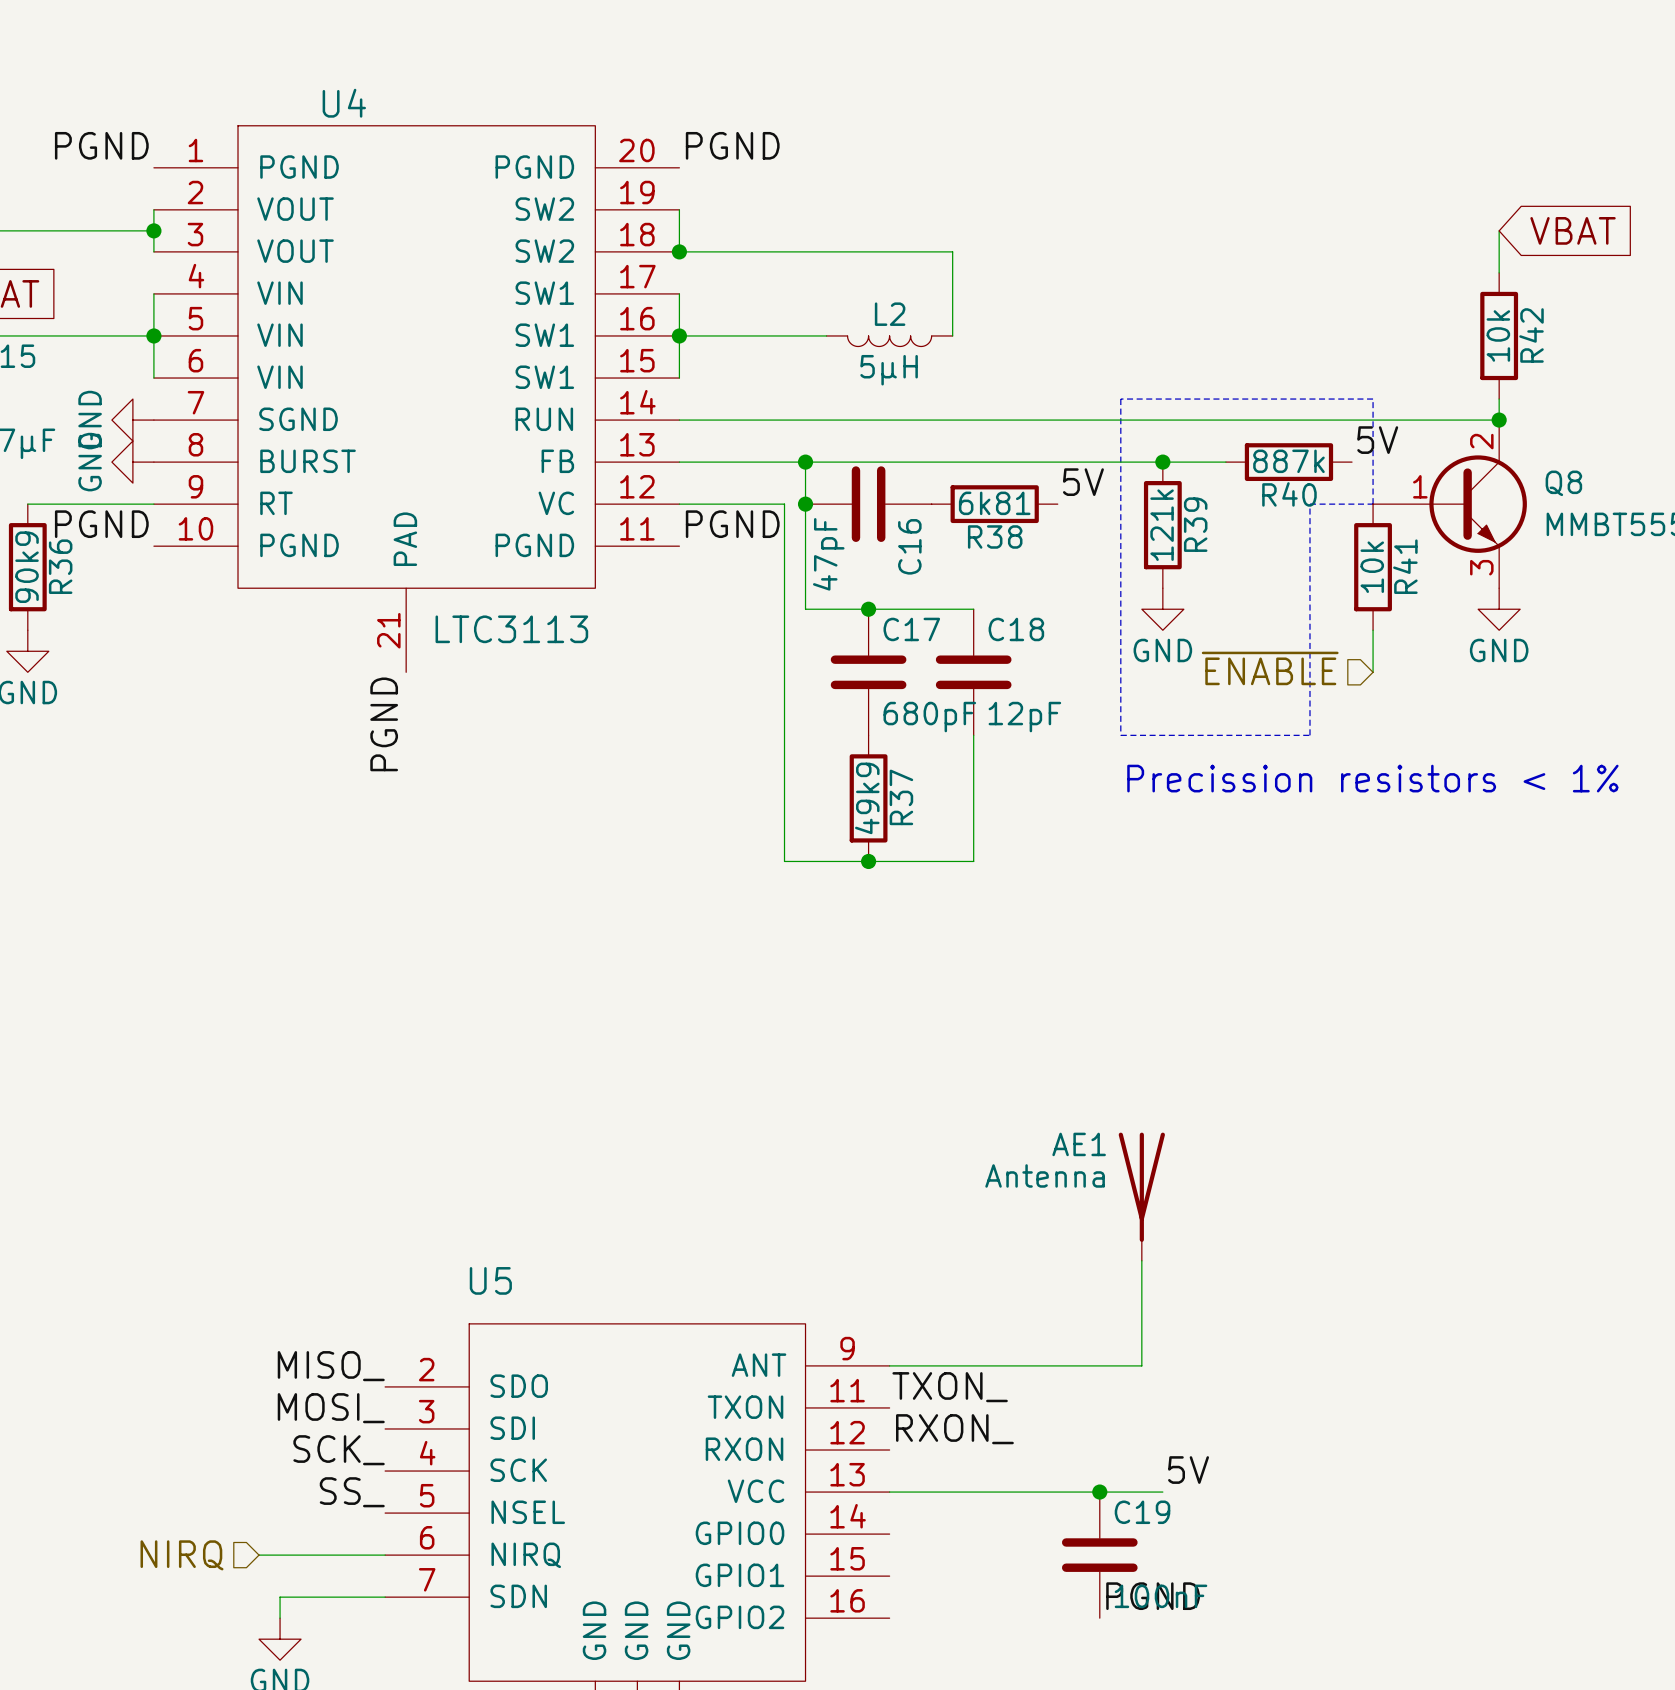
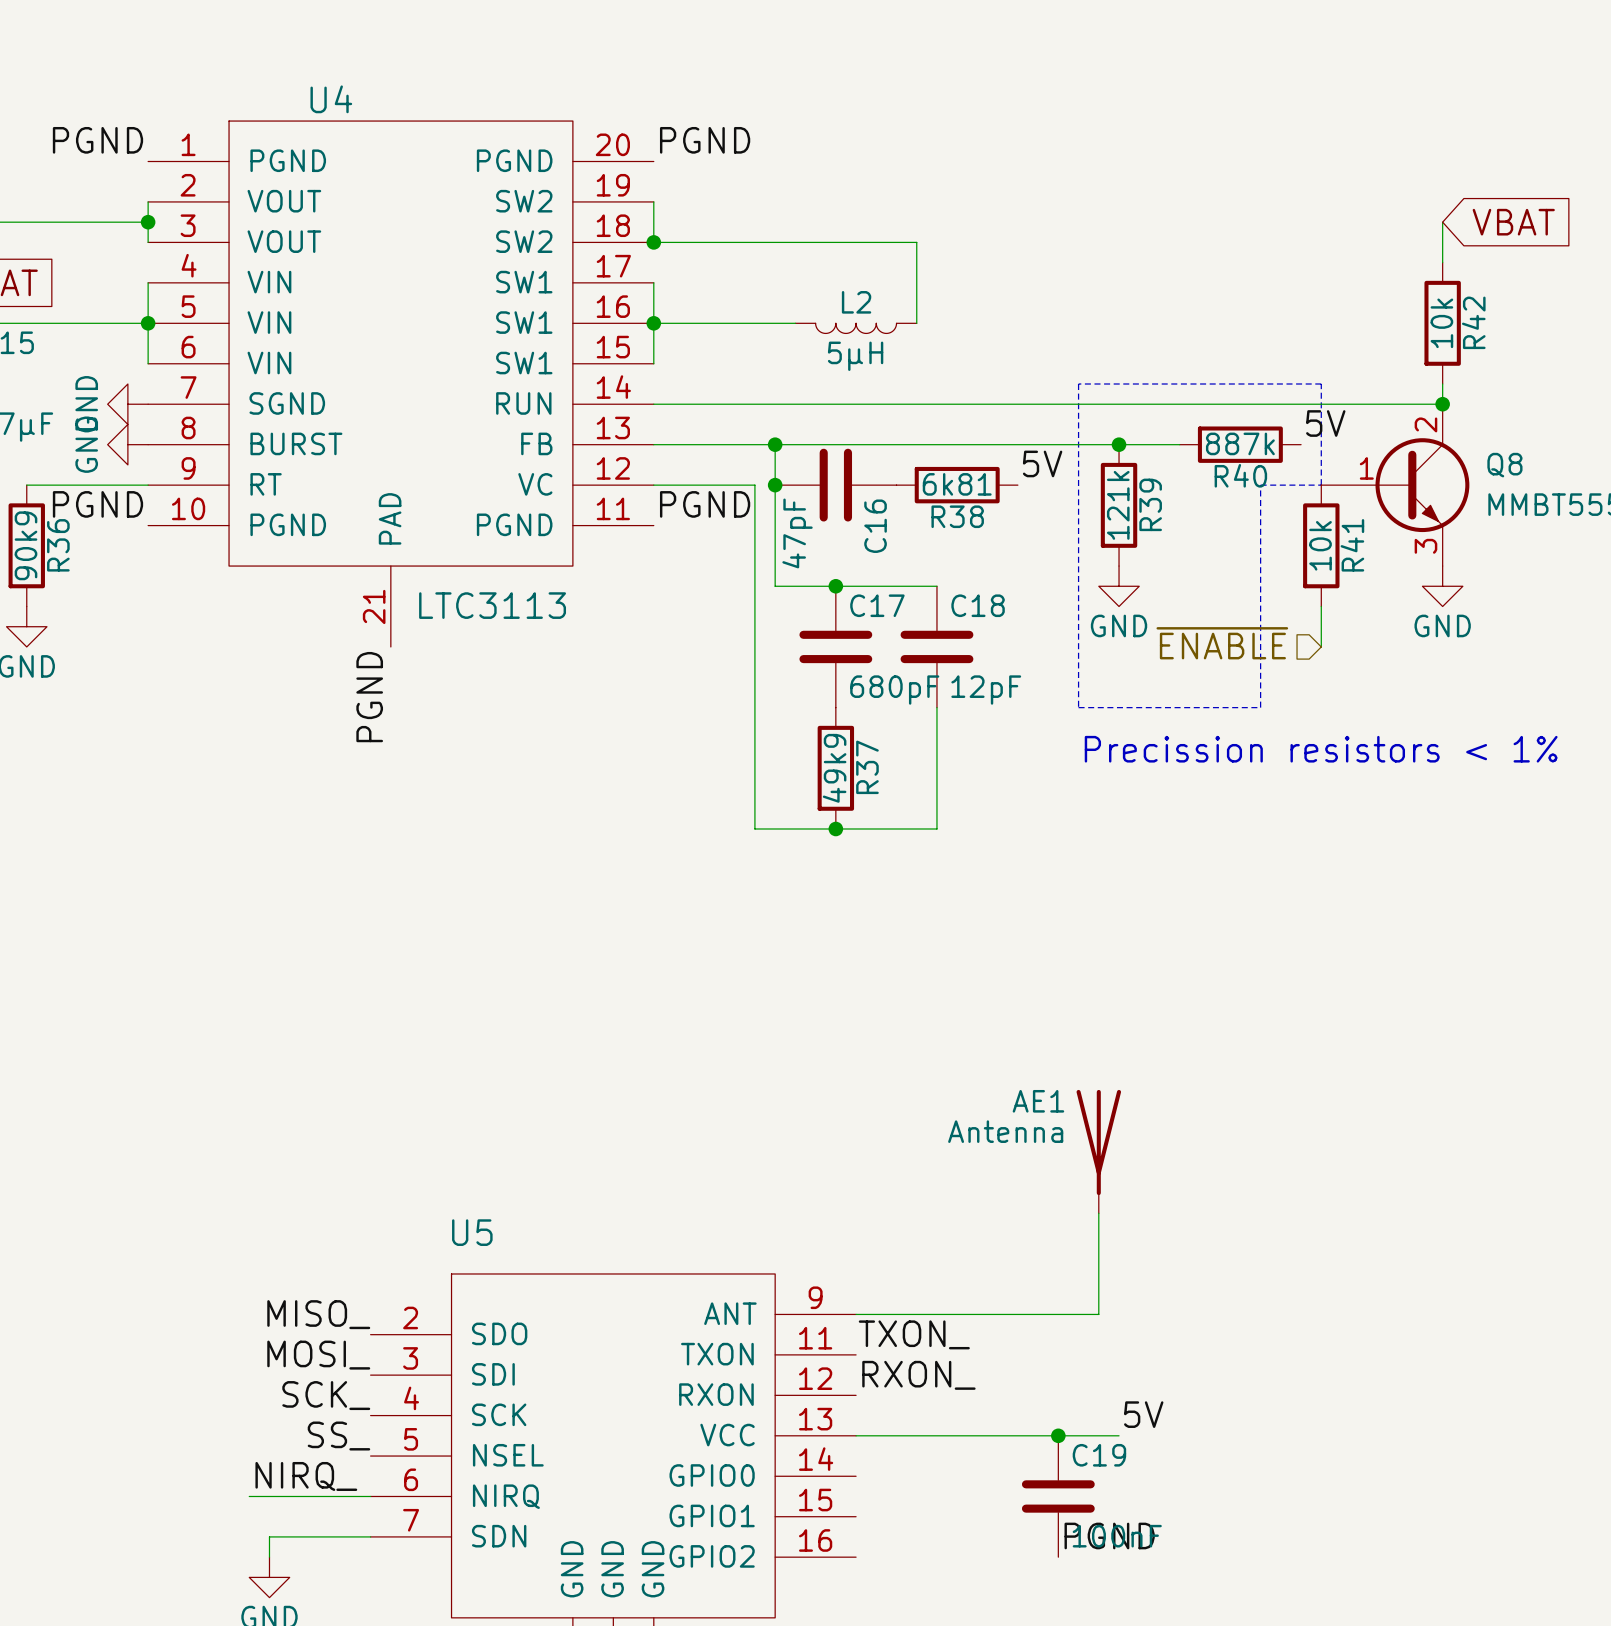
label: none -> NIRQ_ (306, 1476)
hierarchical label: NIRQ (181, 1555) -> none

